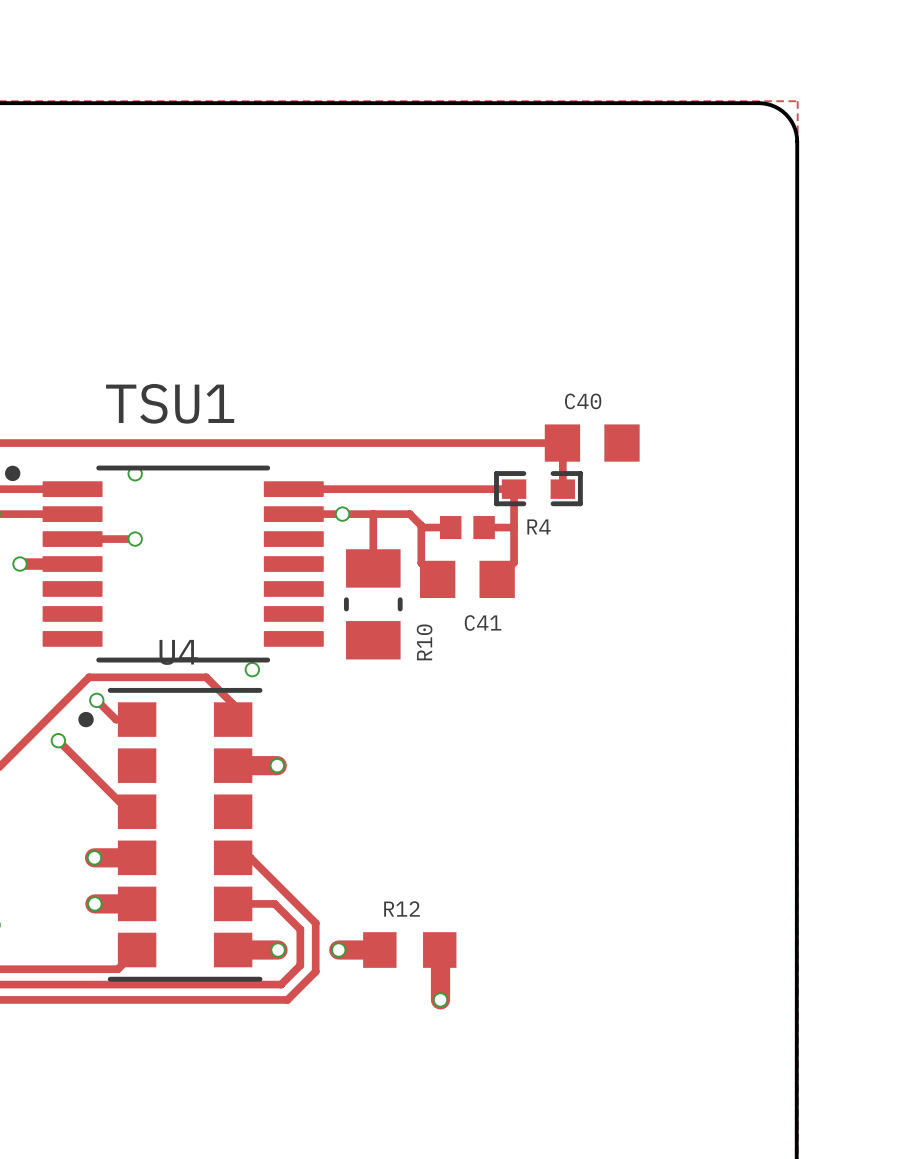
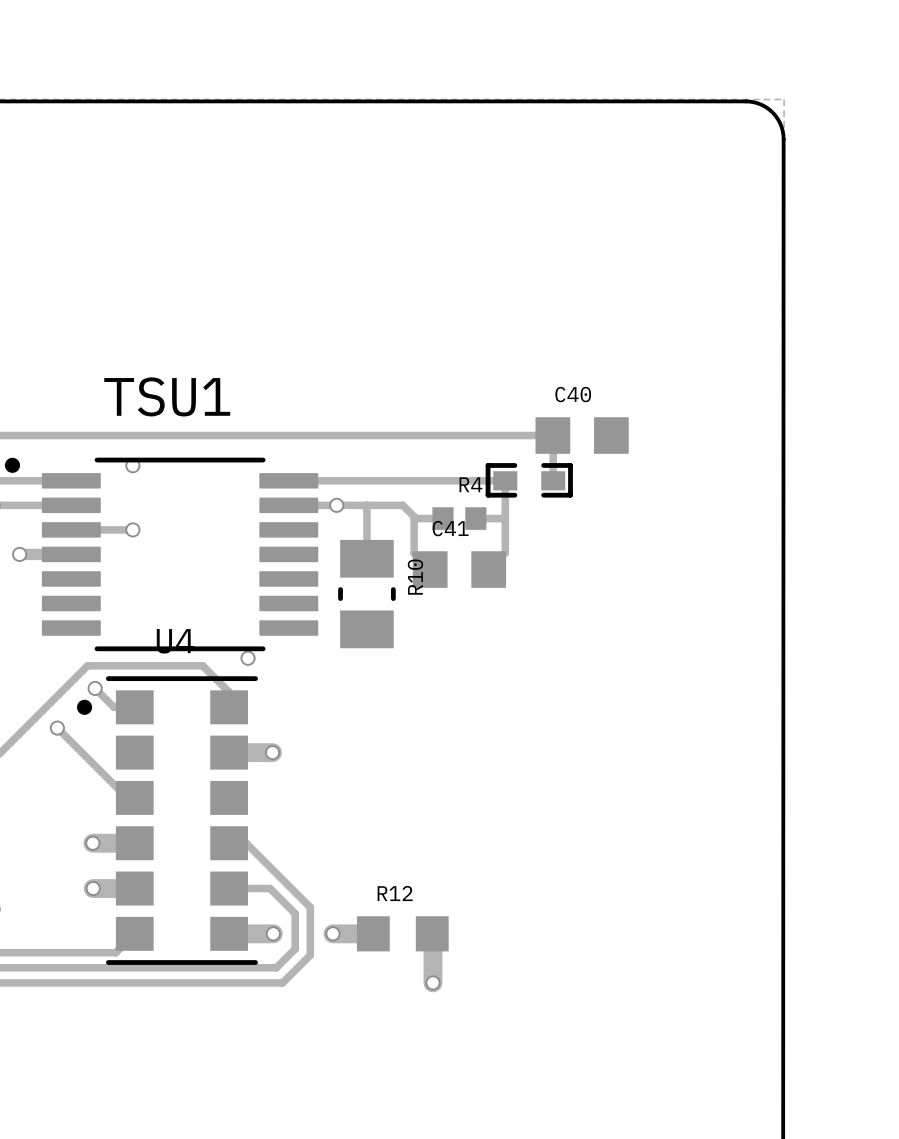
R4 name position: R4 (539, 526) -> R4 (470, 484)
C41 name position: C41 (483, 623) -> C41 (450, 528)
R10 name position: R10 (424, 642) -> R10 (415, 577)

